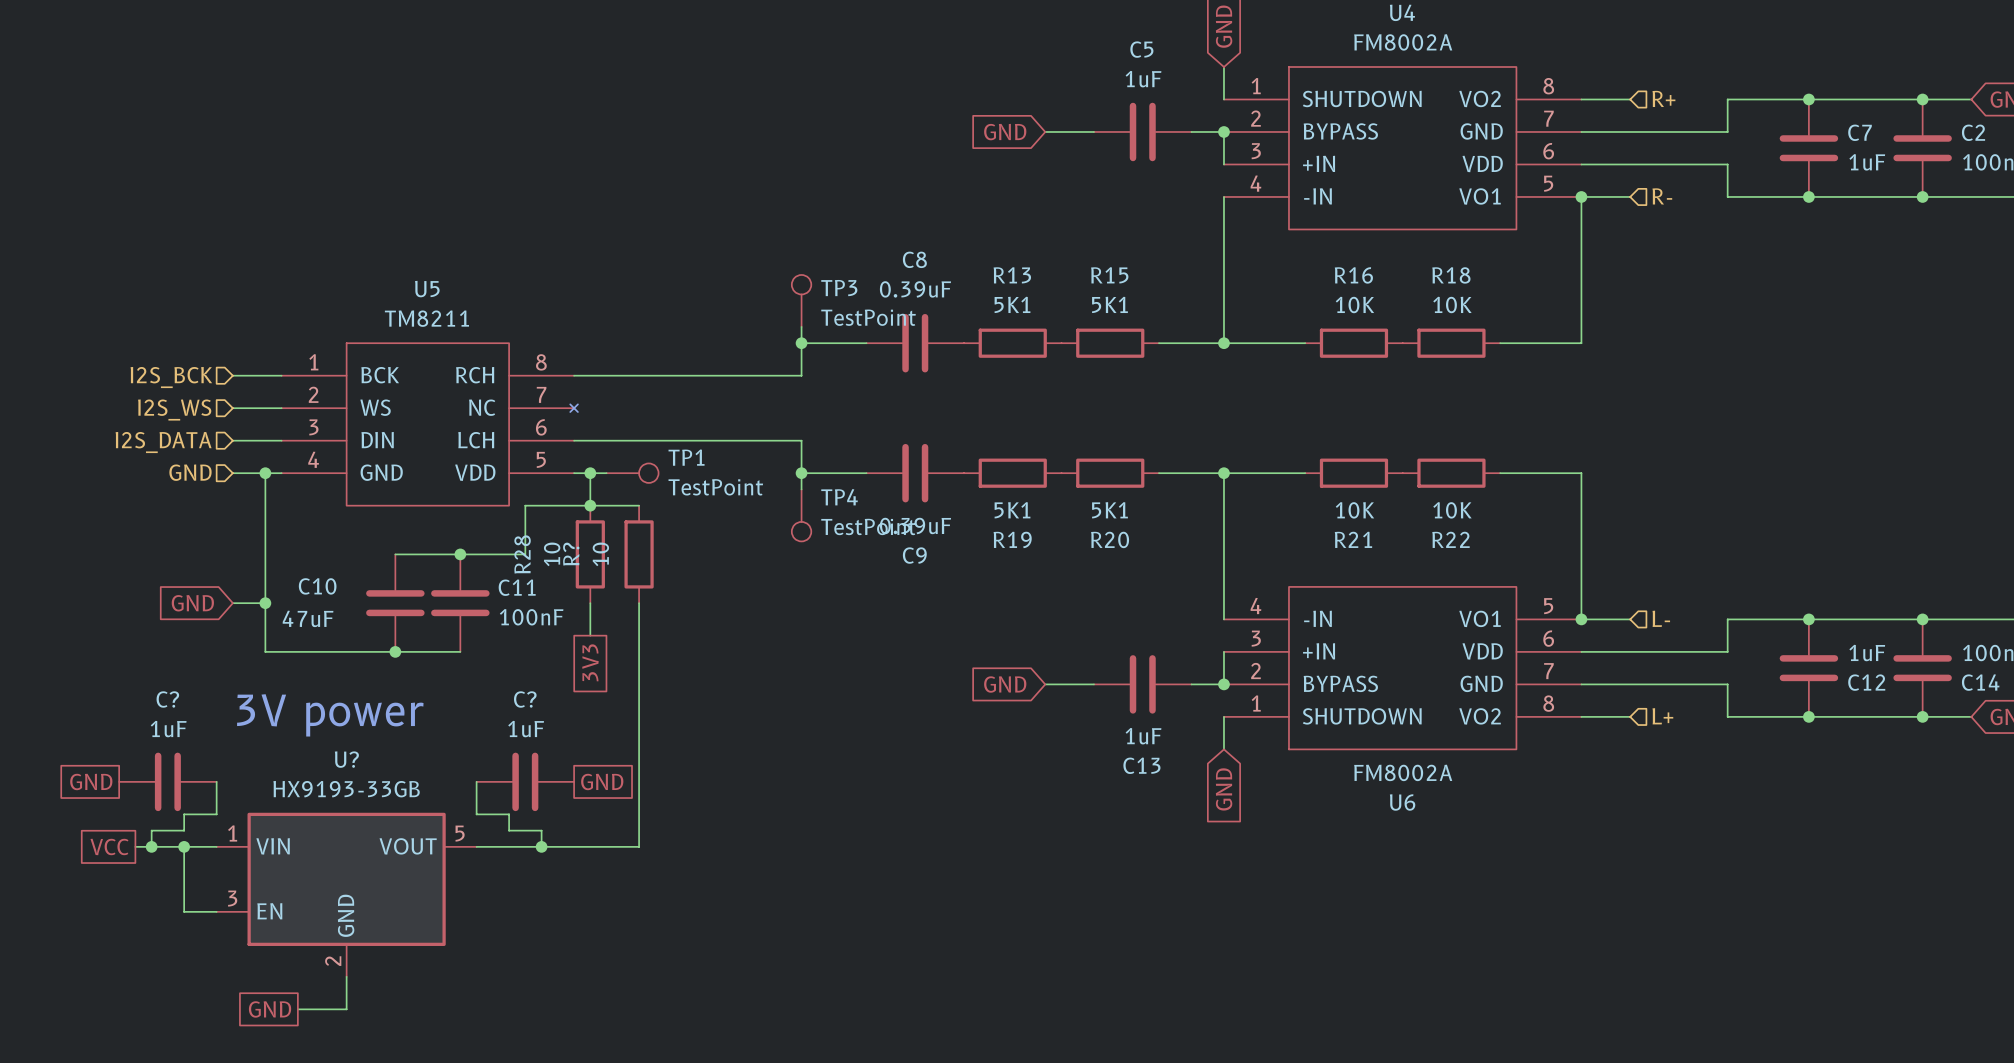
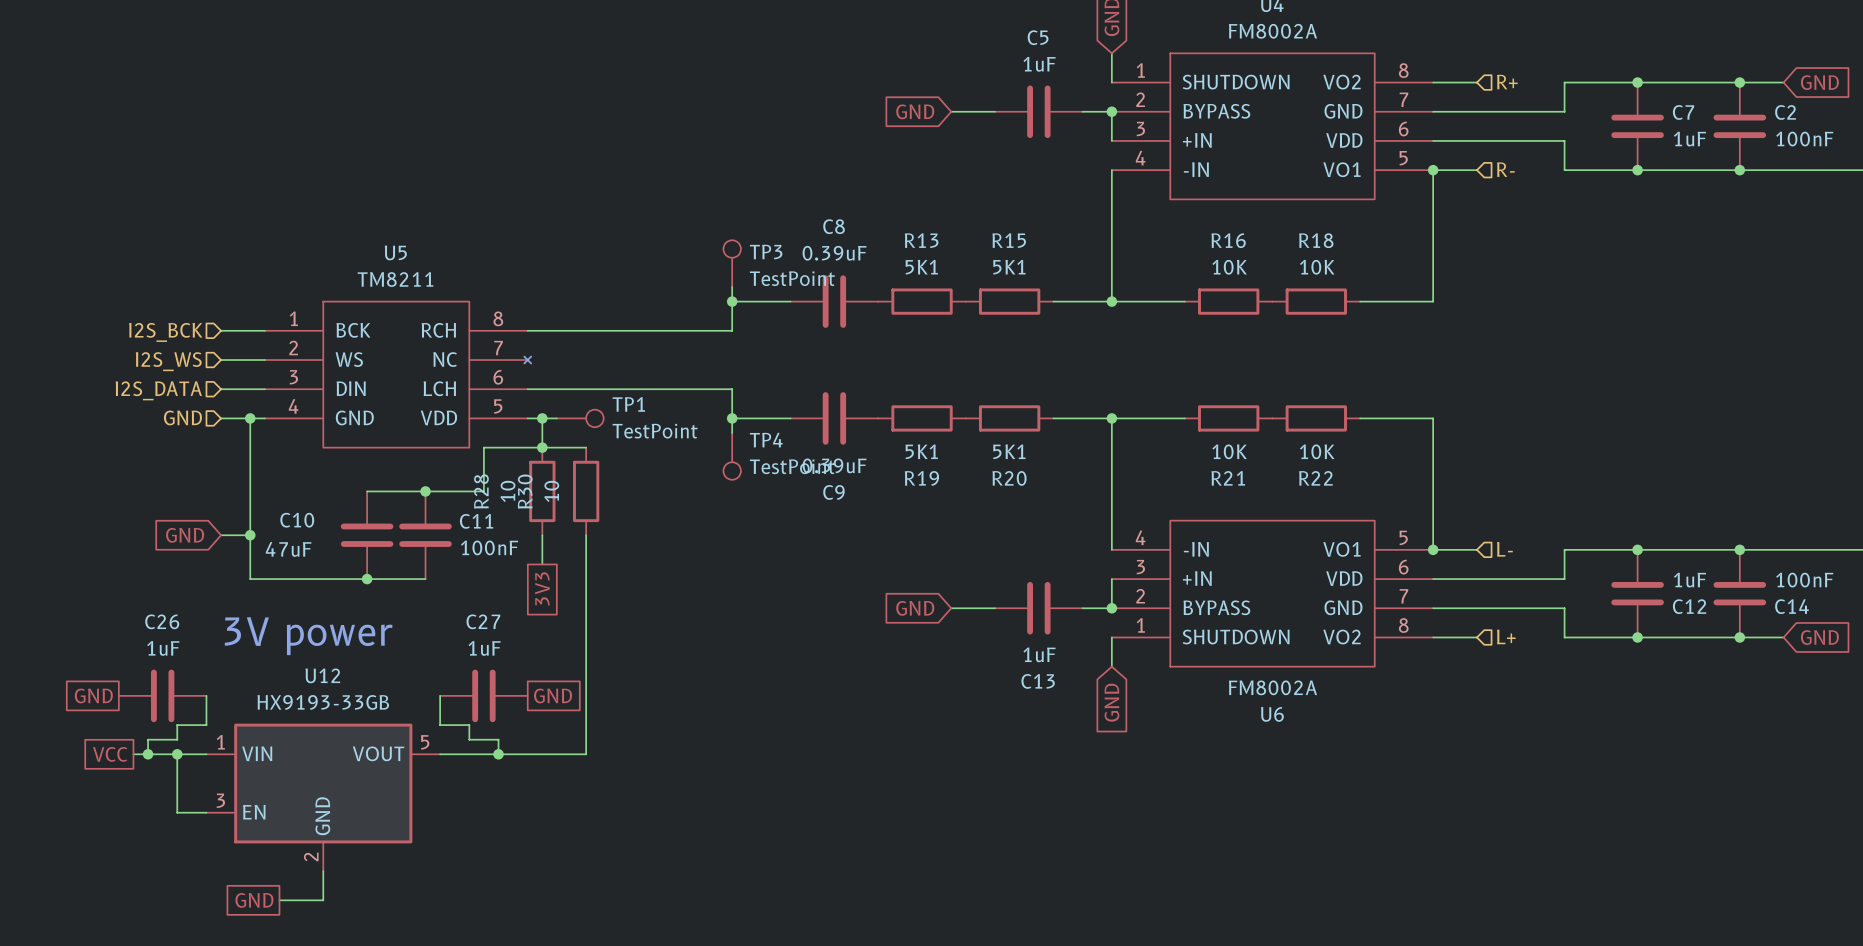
R? name: R? (571, 554) -> R30 (525, 491)
C? name: C? (167, 699) -> C26 (162, 621)
C? name: C? (525, 699) -> C27 (483, 621)
U? name: U? (346, 759) -> U12 (322, 675)

